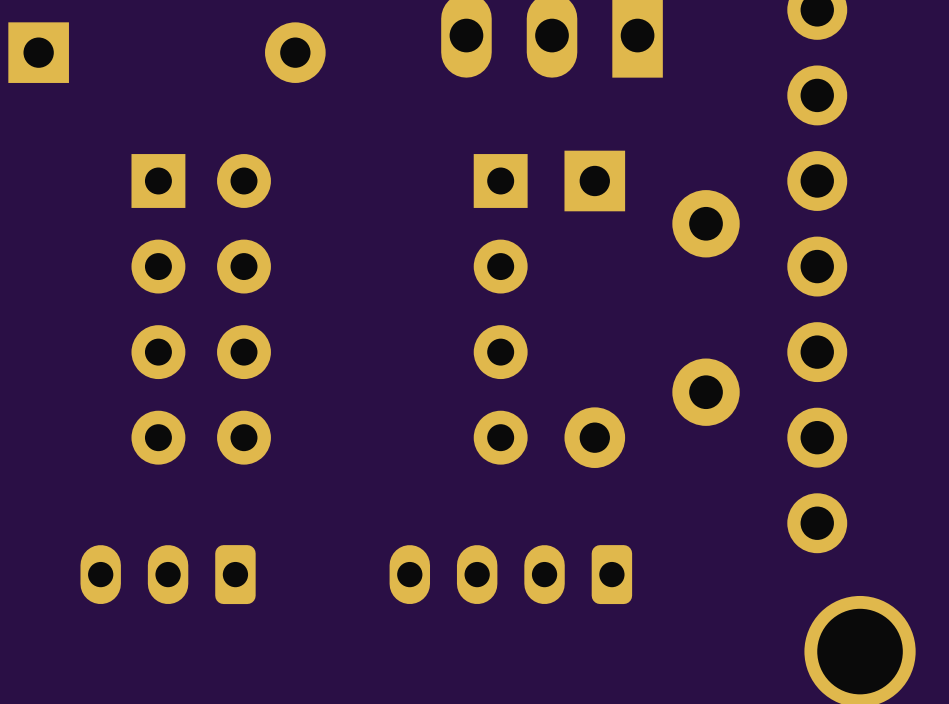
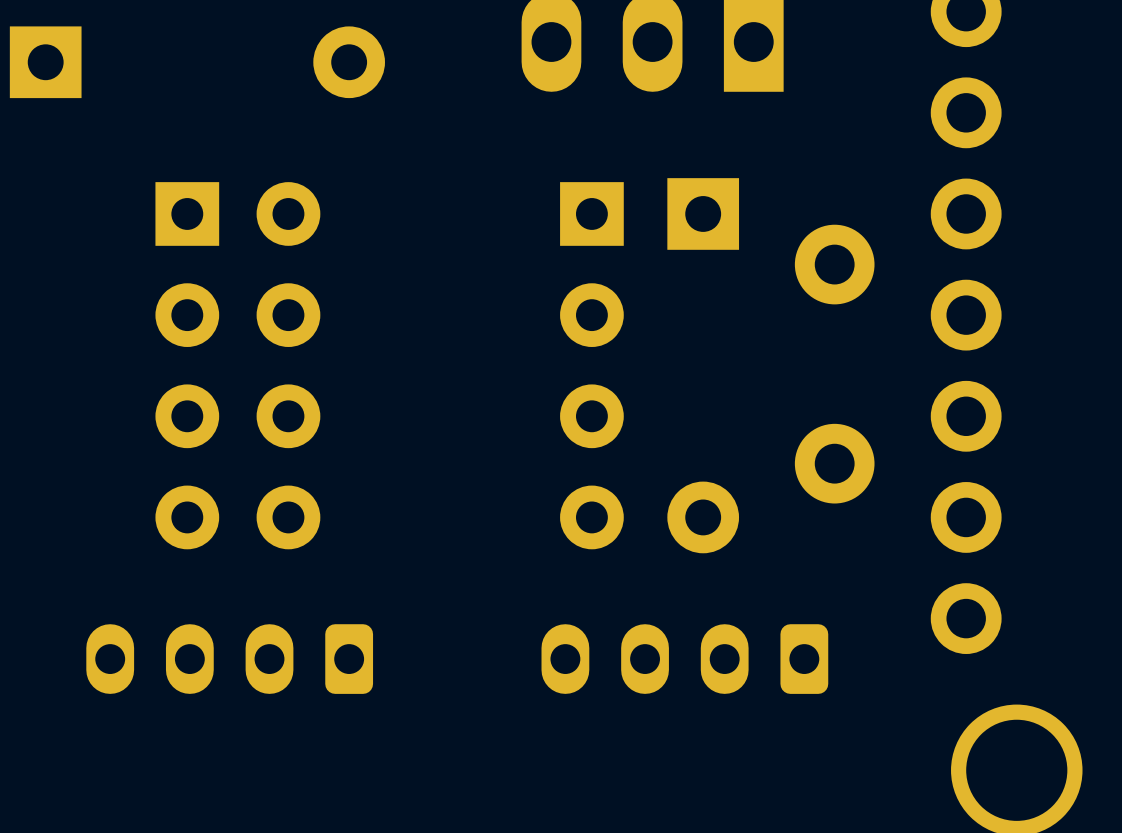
part footprint: [80, 545, 256, 605] -> [86, 624, 374, 694]
part position: (510, 574) -> (684, 659)

